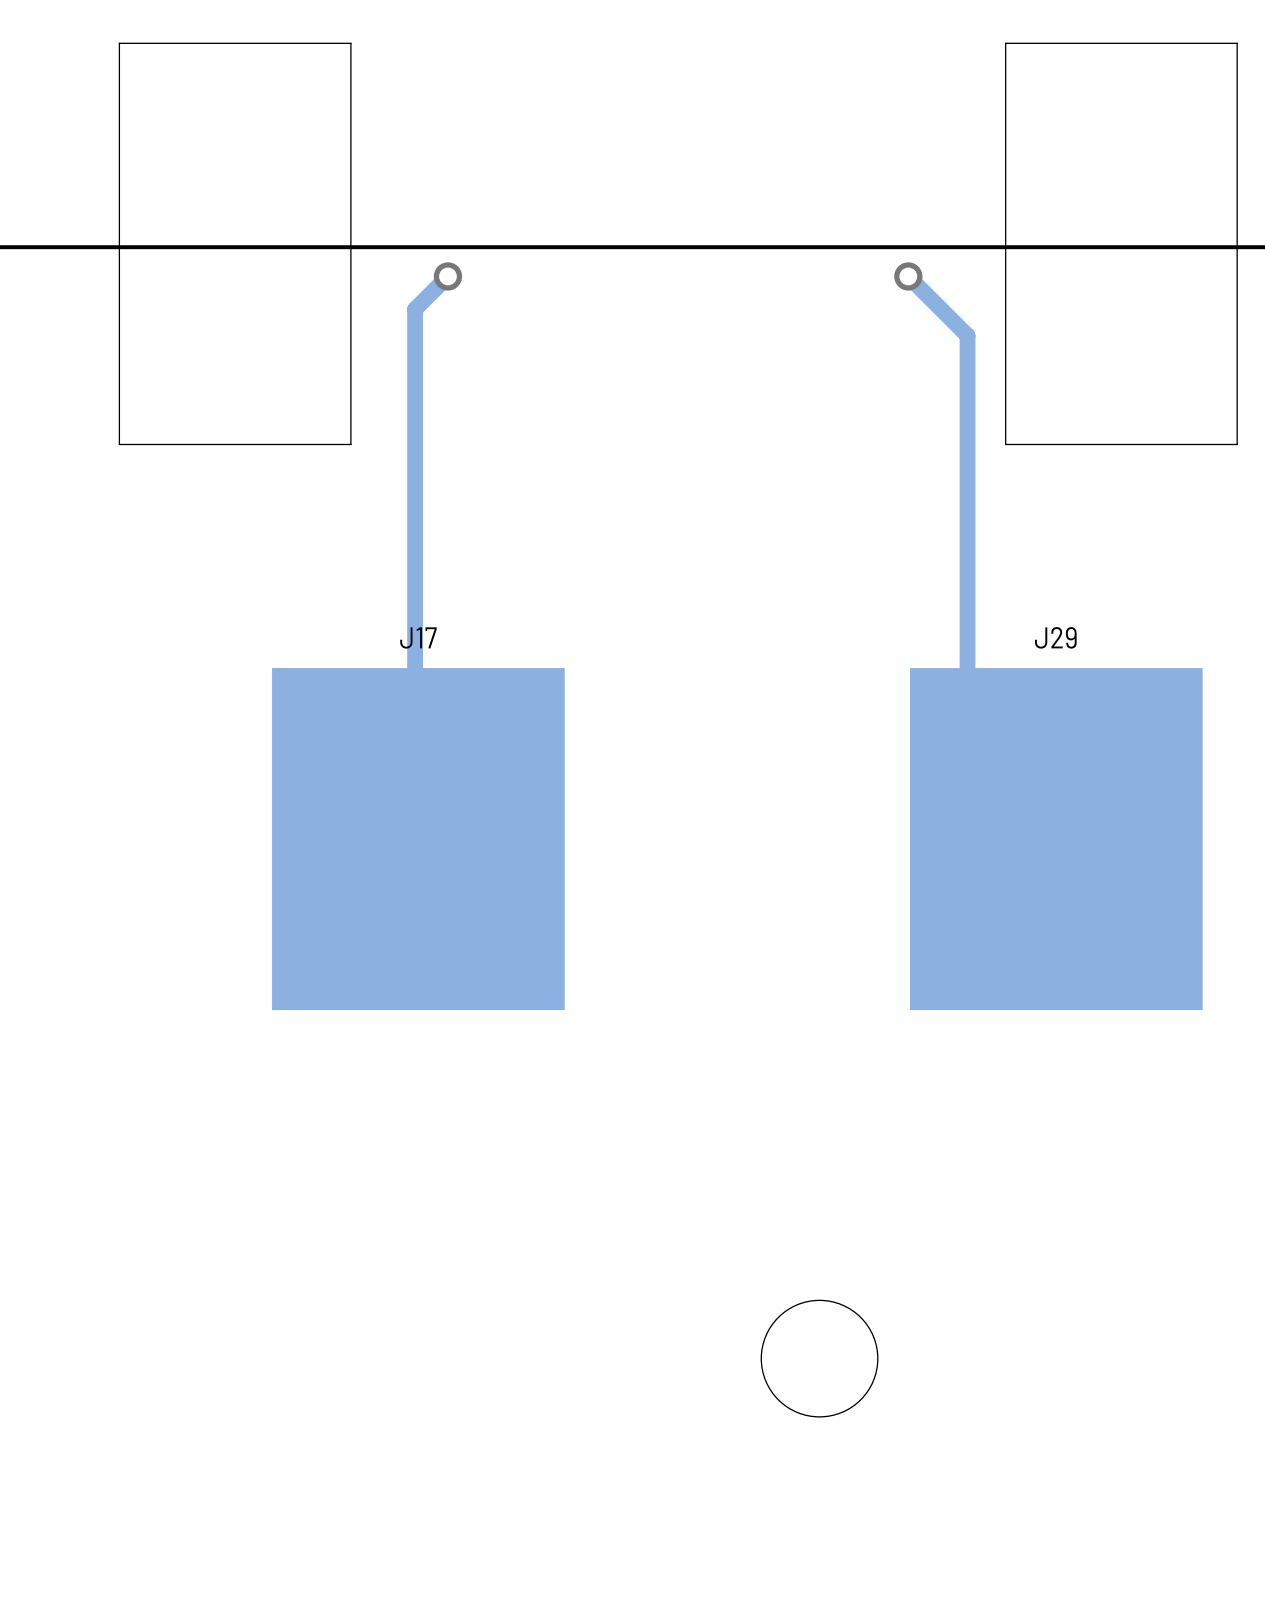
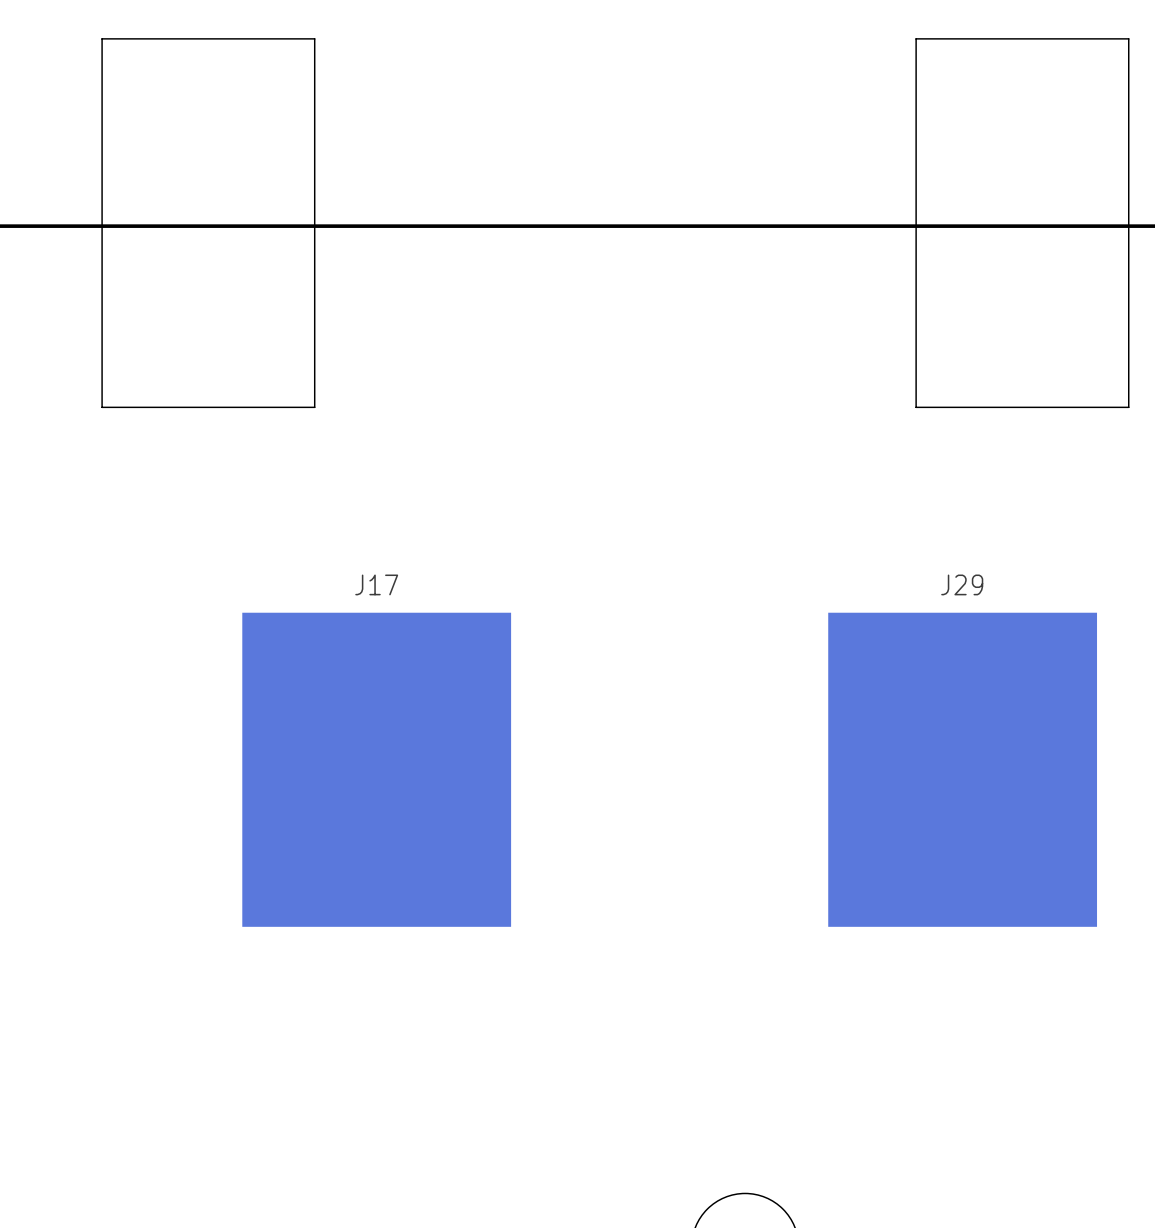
track: (447, 276) (415, 309) (415, 816) -> none
via: (447, 276) -> none
track: (908, 276) (967, 335) (967, 753) -> none
via: (908, 276) -> none

